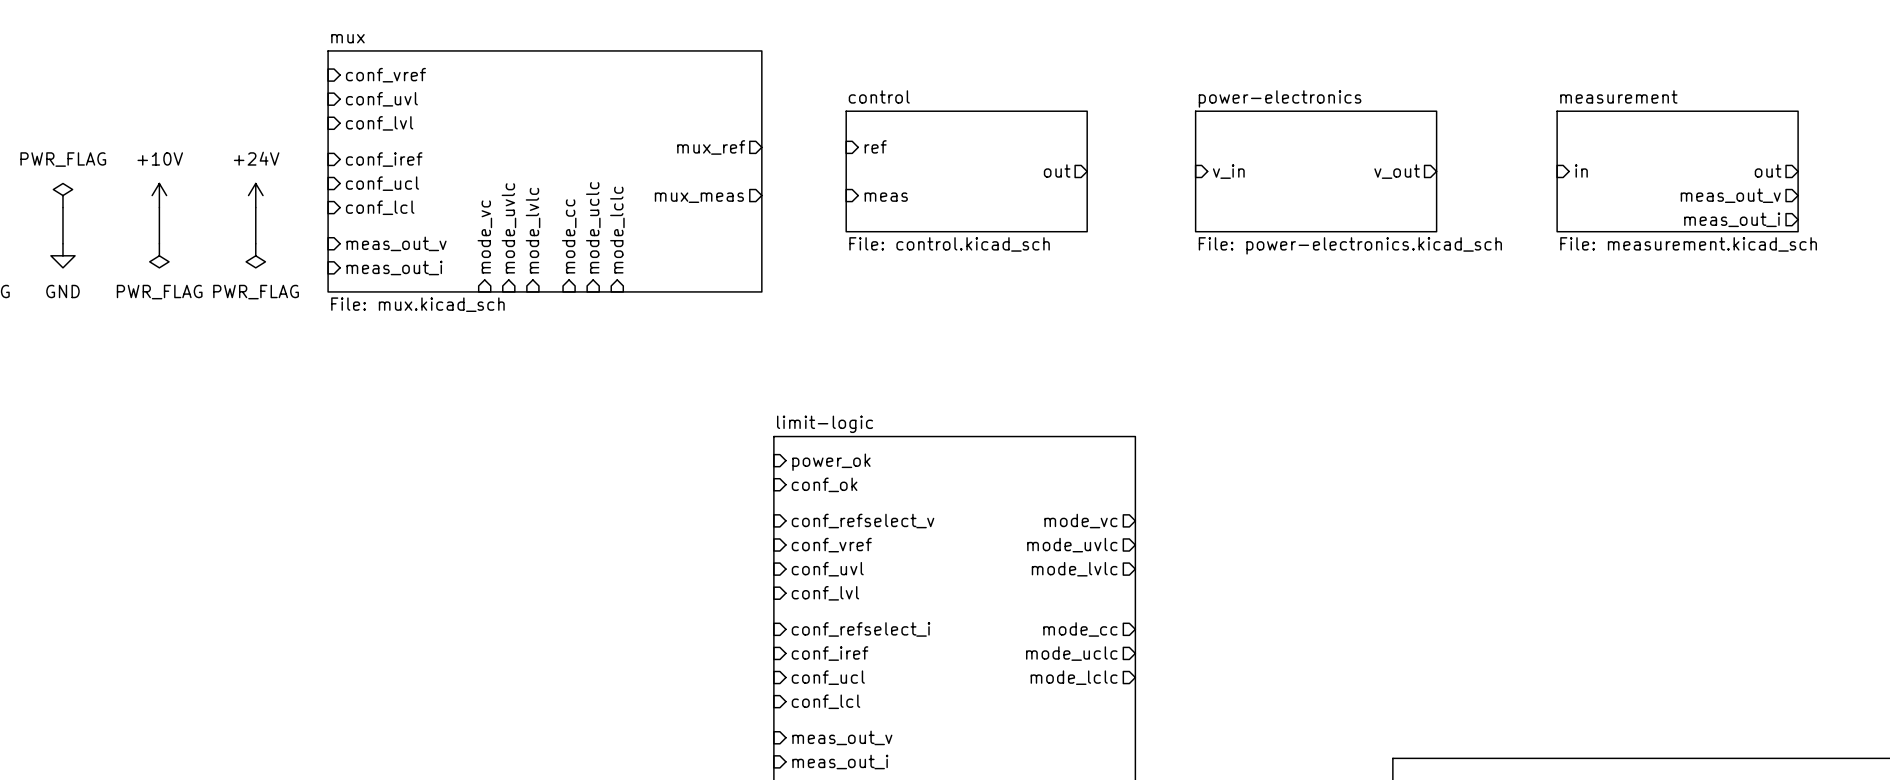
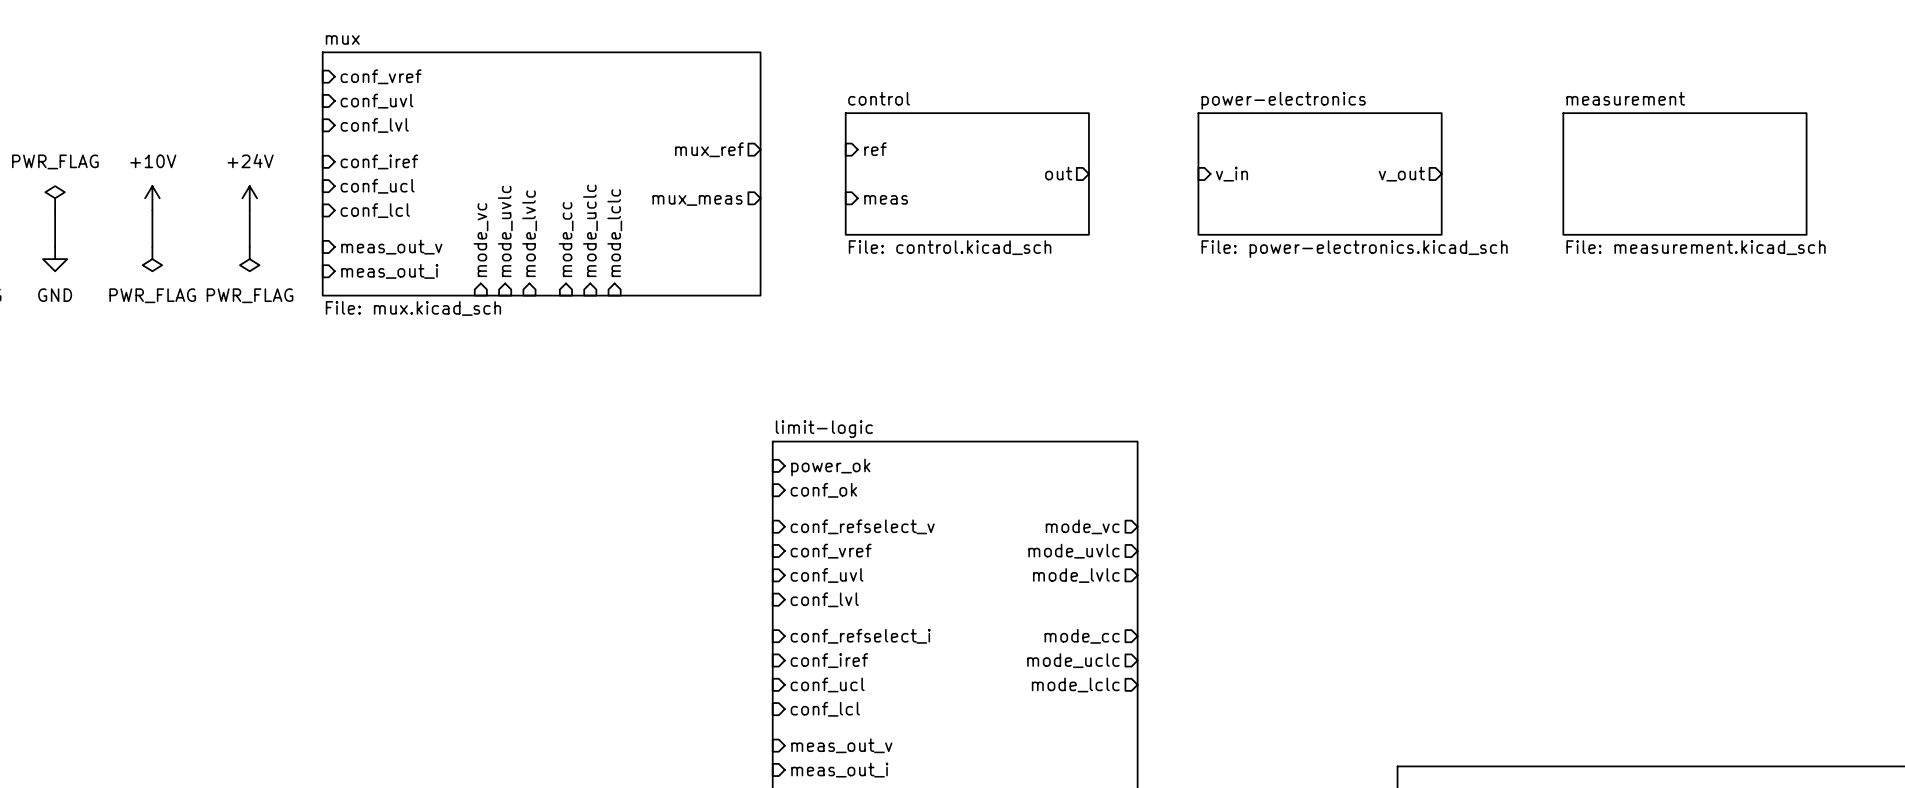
sheet pin: in (1581, 171) -> none
sheet pin: out (1768, 171) -> none
sheet pin: meas_out_v (1730, 195) -> none
sheet pin: meas_out_i (1732, 219) -> none

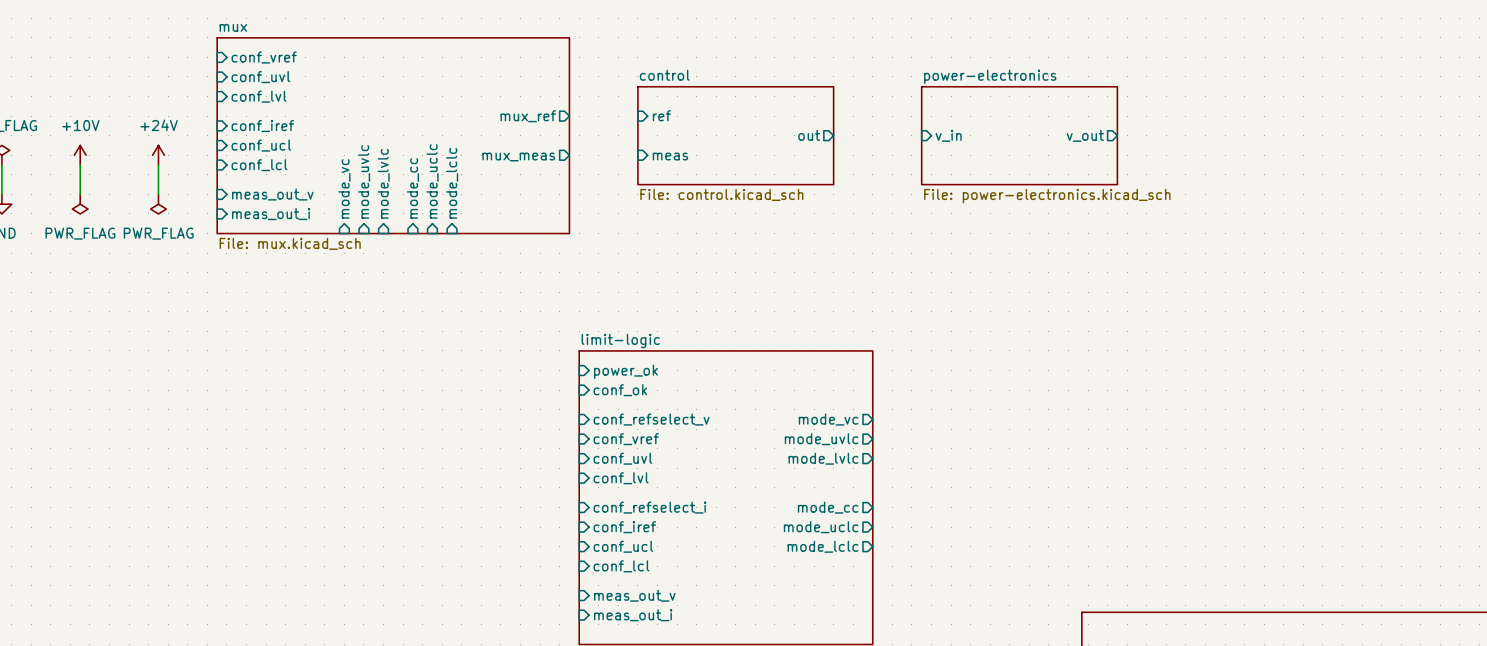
sheet measurement: File: measurement.kicad_sch (1684, 173) -> none

